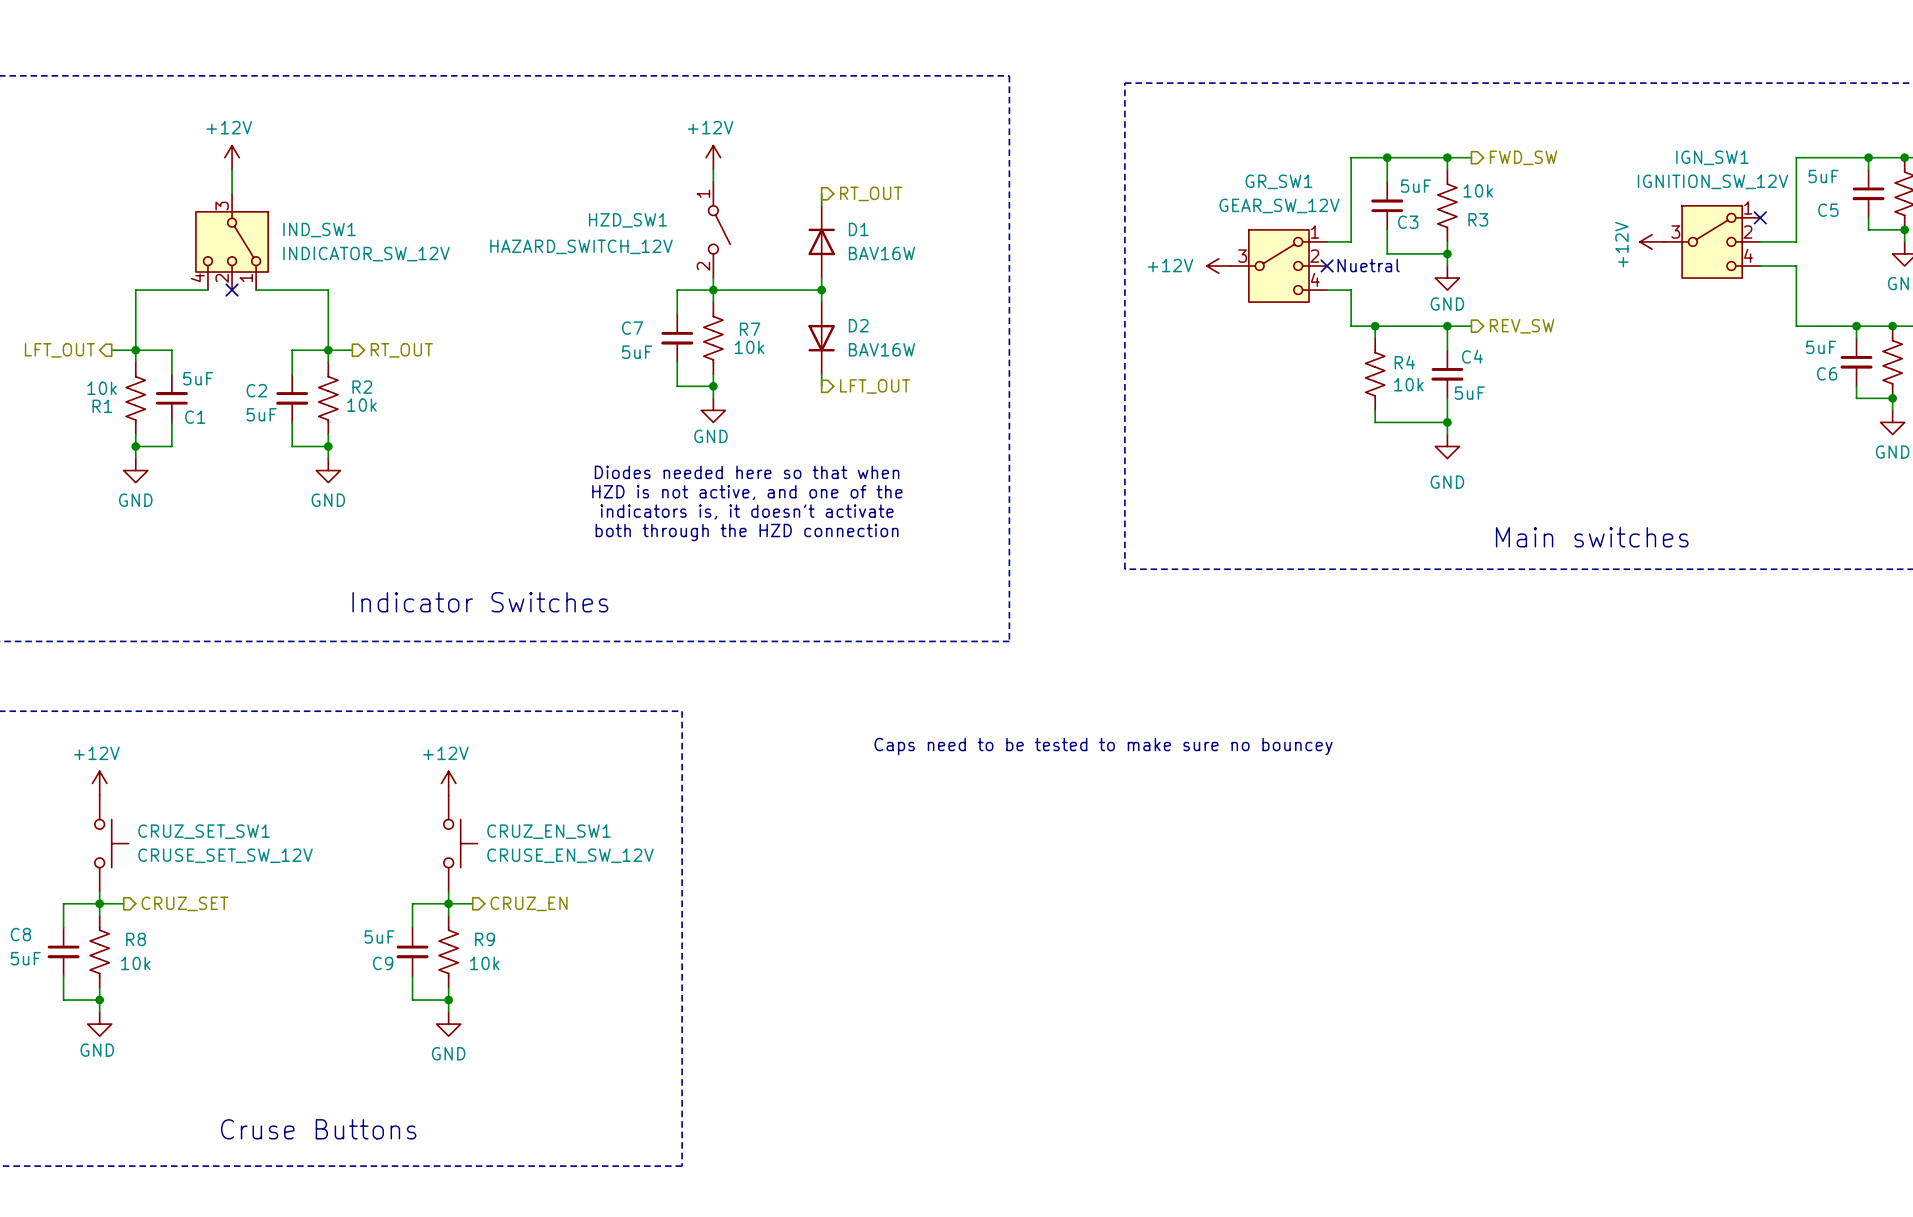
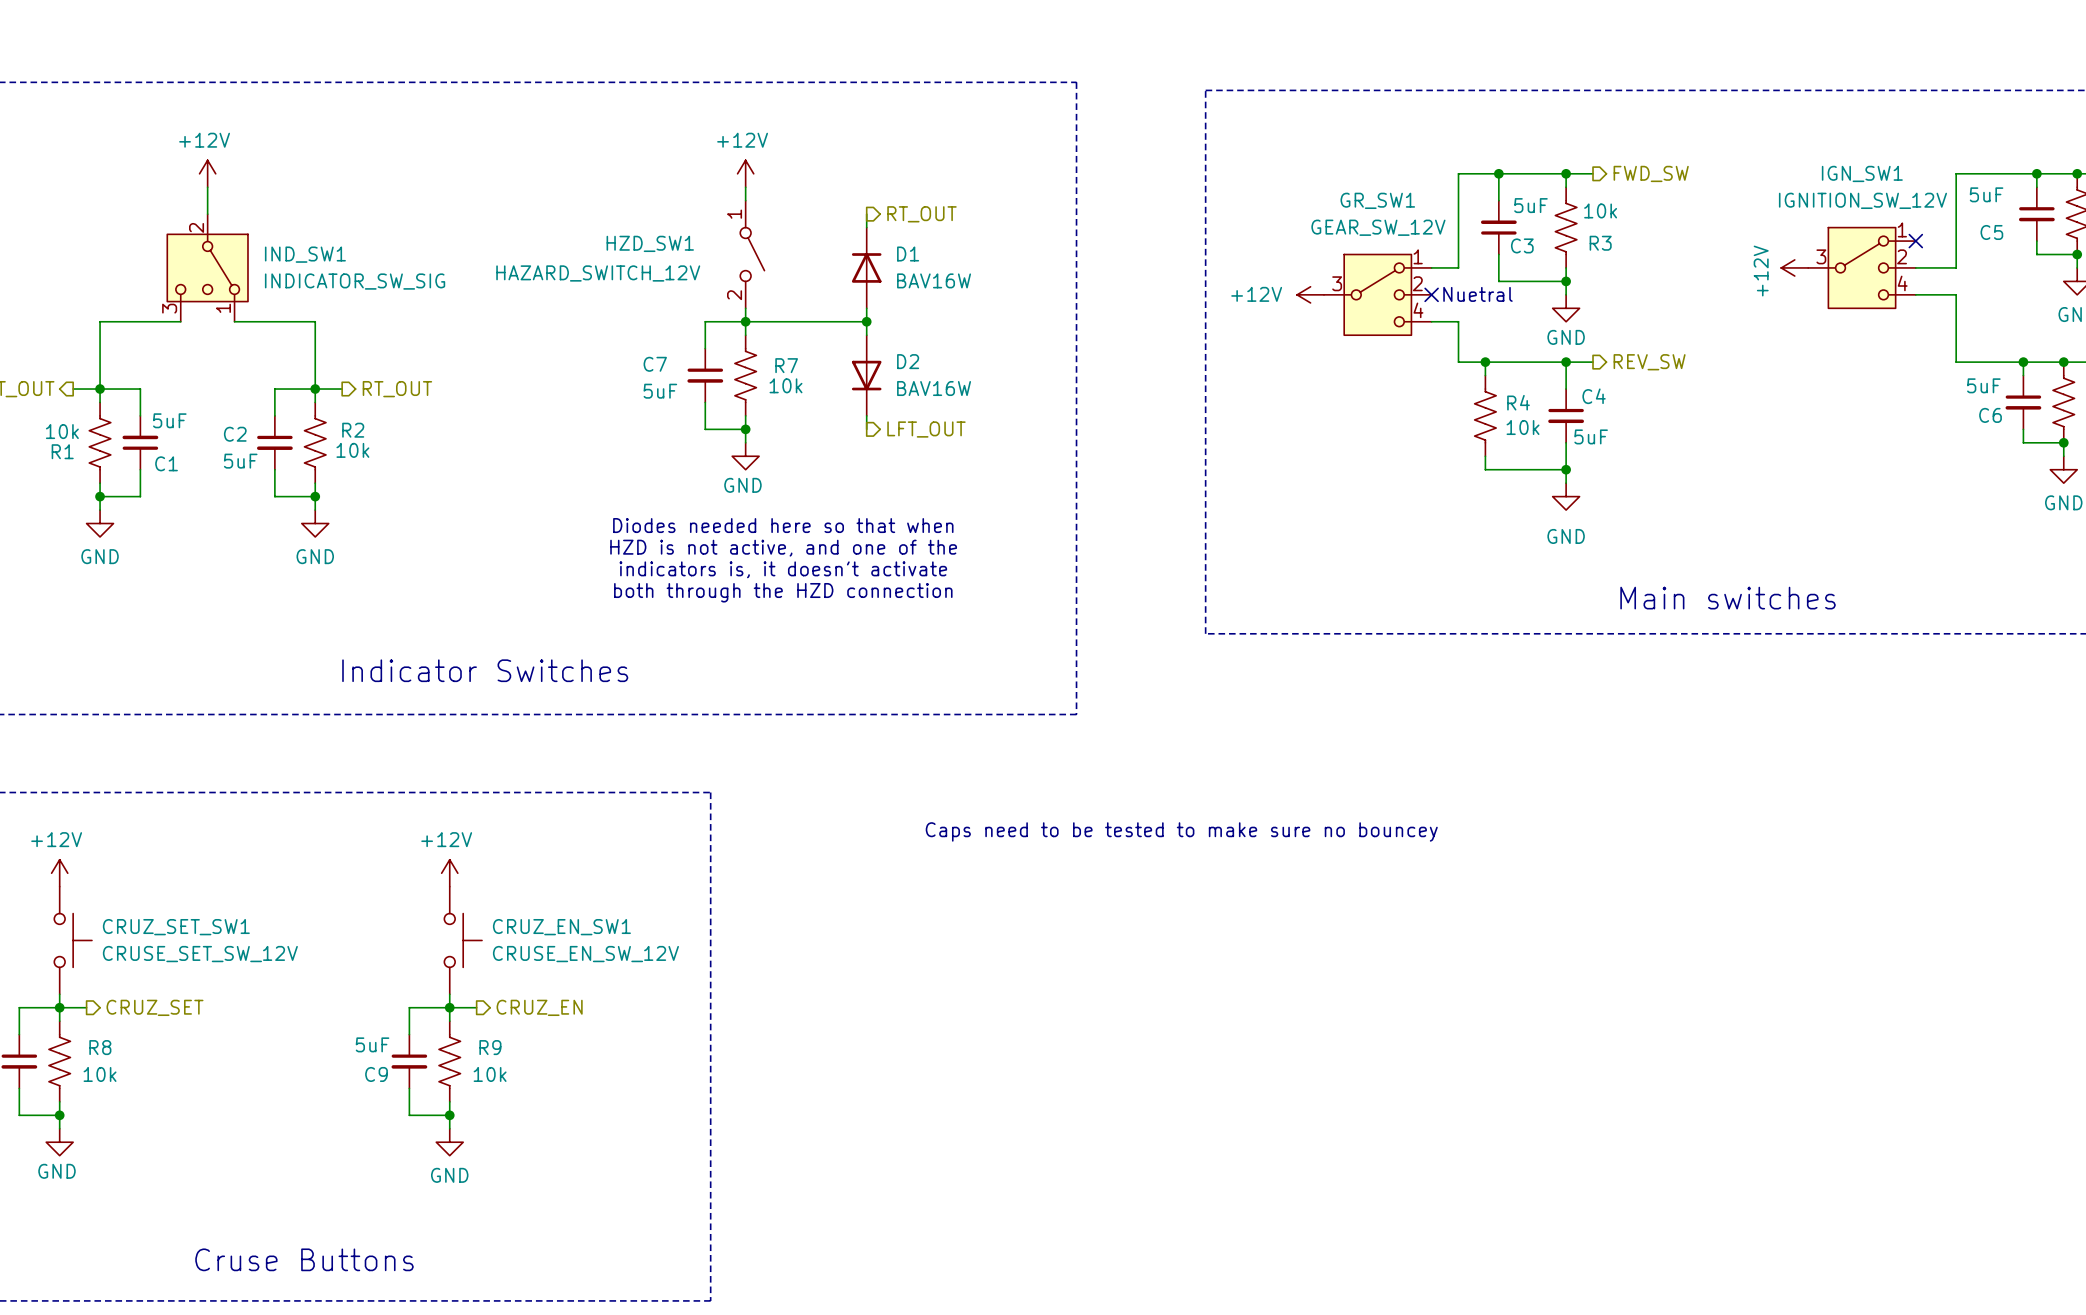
IND_SW1 symbol: [195, 193, 269, 291] -> [167, 214, 248, 322]
IND_SW1 value: INDICATOR_SW_12V (366, 254) -> INDICATOR_SW_SIG (355, 281)
no-connect mark: (232, 290) -> none

